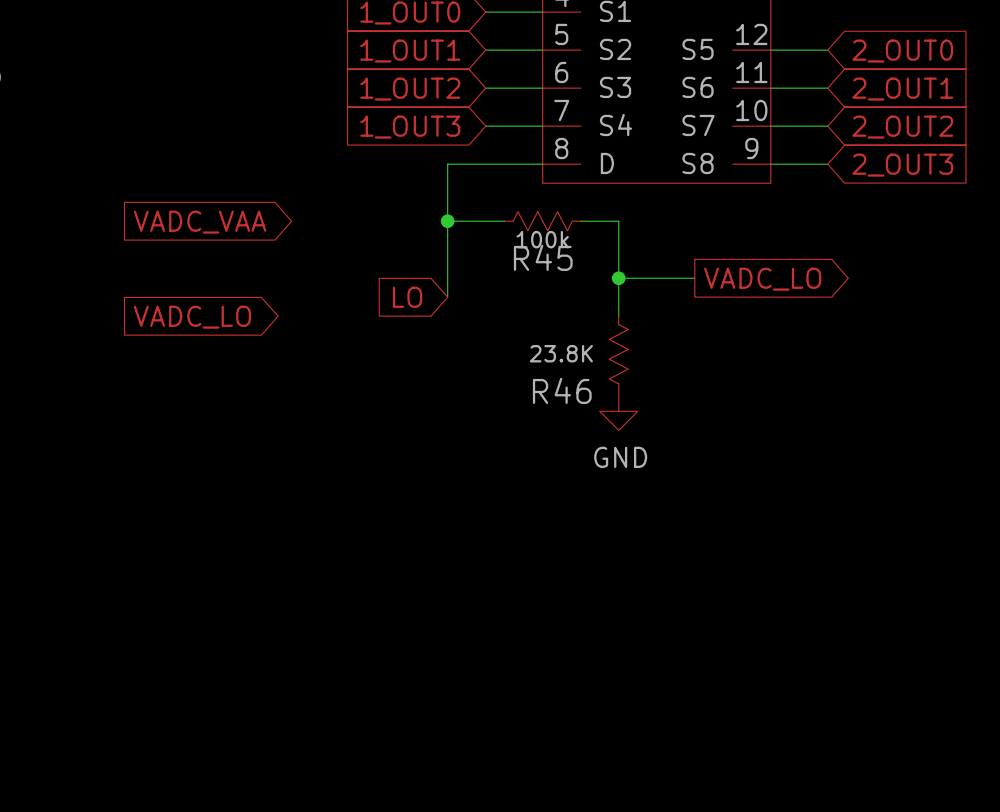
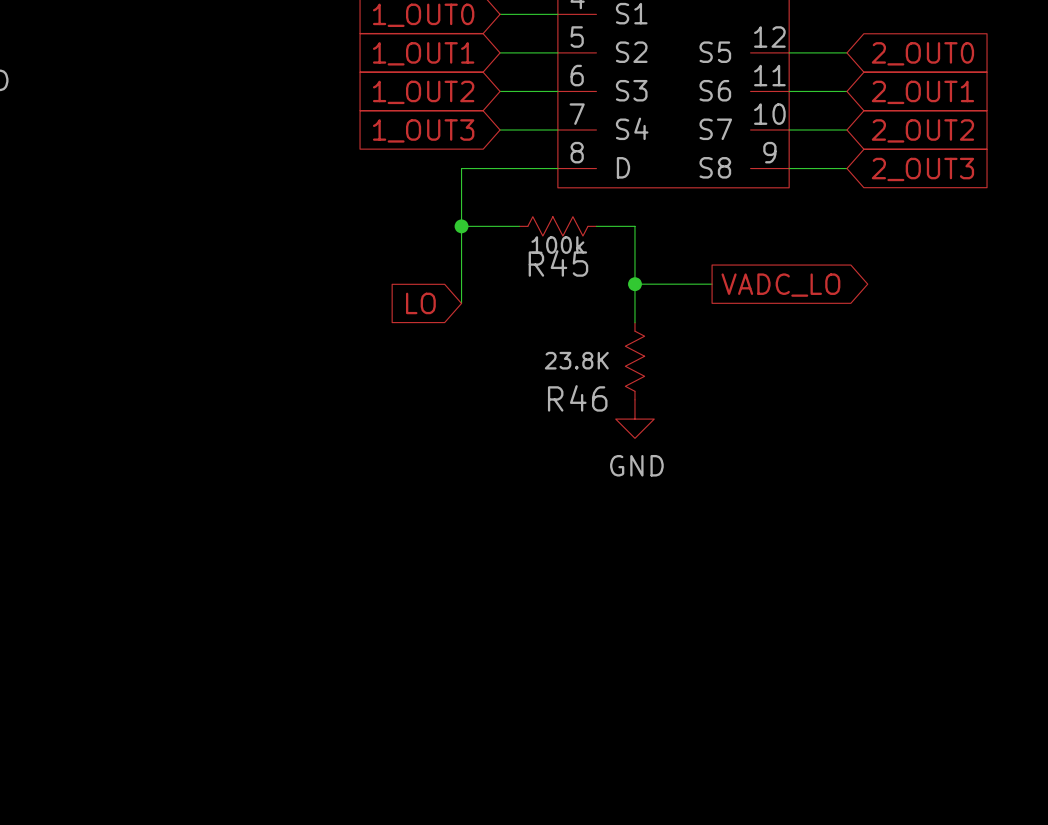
global label: VADC_VAA (200, 222) -> none
global label: VADC_LO (192, 317) -> none

